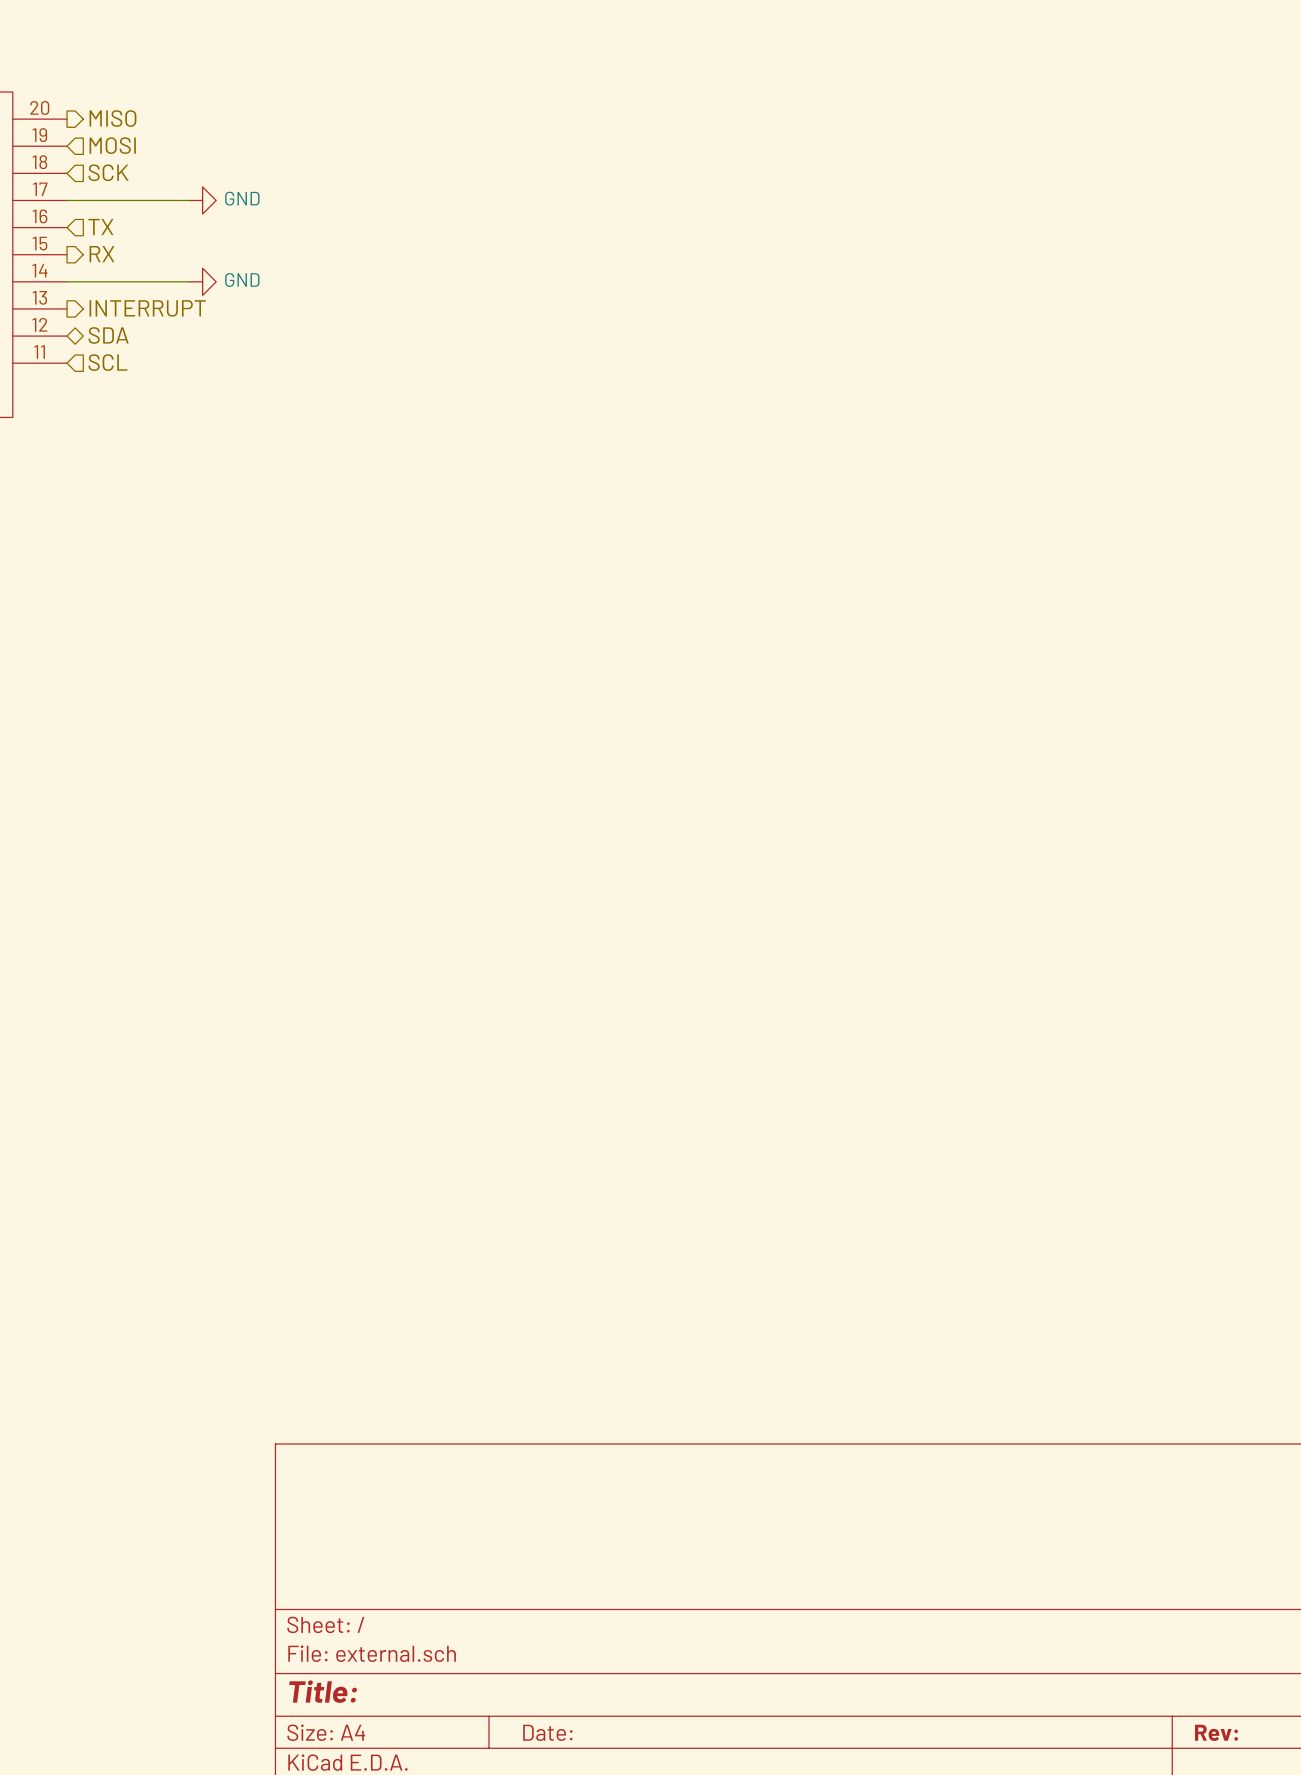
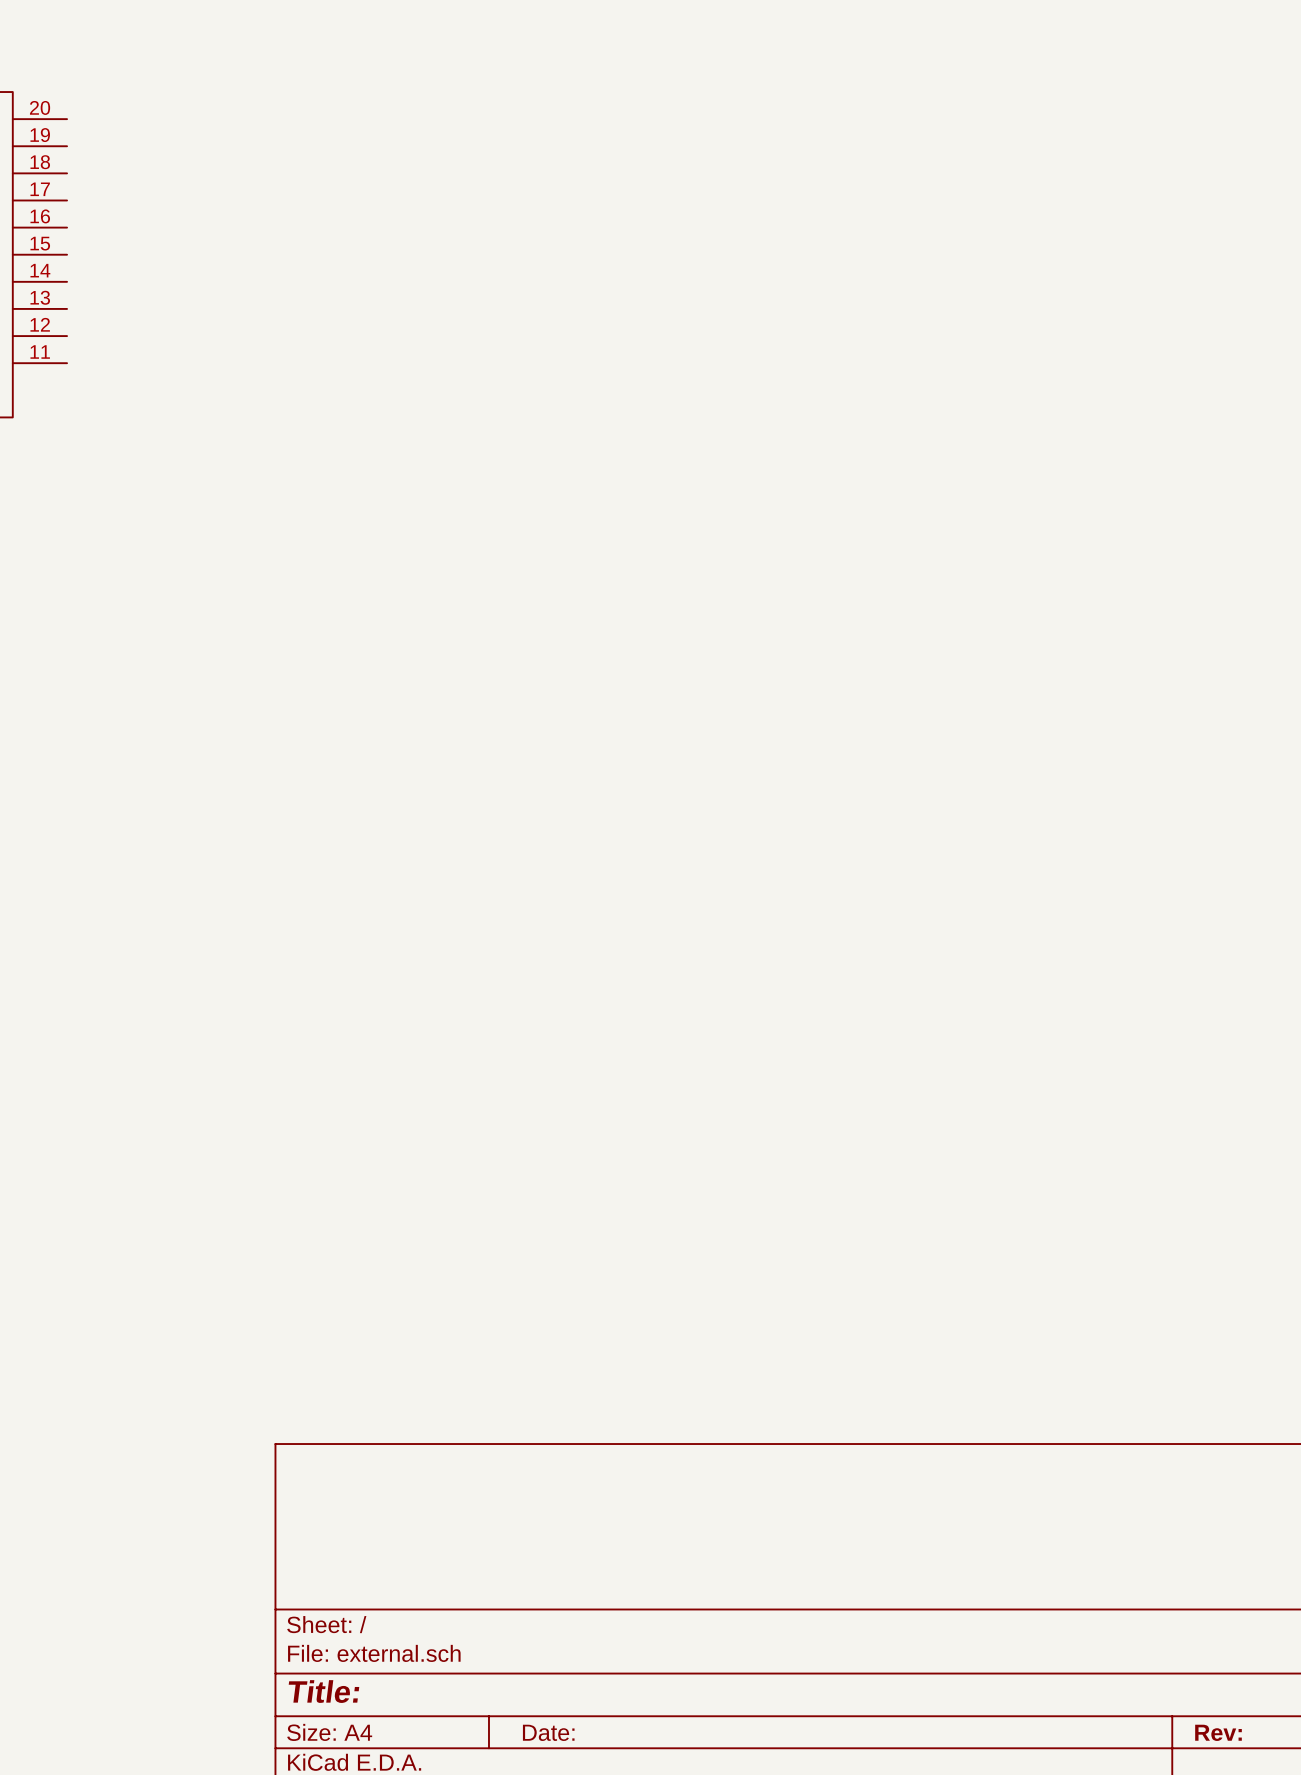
hierarchical label: MISO (112, 118) -> none
hierarchical label: MOSI (112, 145) -> none
hierarchical label: SCK (108, 172) -> none
wire: (67, 200) (189, 200) -> none
power symbol: GND (202, 200) -> none
hierarchical label: TX (100, 226) -> none
hierarchical label: RX (101, 254) -> none
wire: (67, 281) (189, 281) -> none
power symbol: GND (202, 281) -> none
hierarchical label: INTERRUPT (147, 308) -> none
hierarchical label: SDA (108, 335) -> none
hierarchical label: SCL (108, 362) -> none

